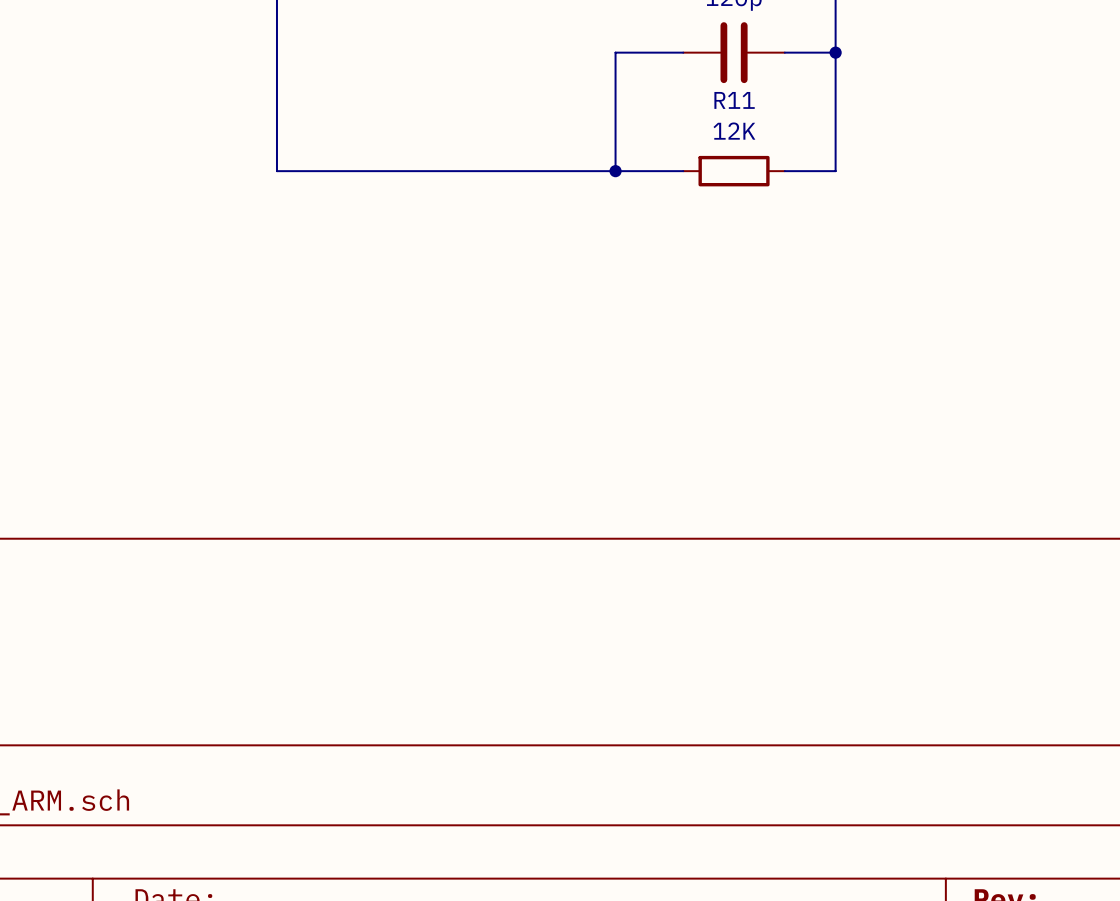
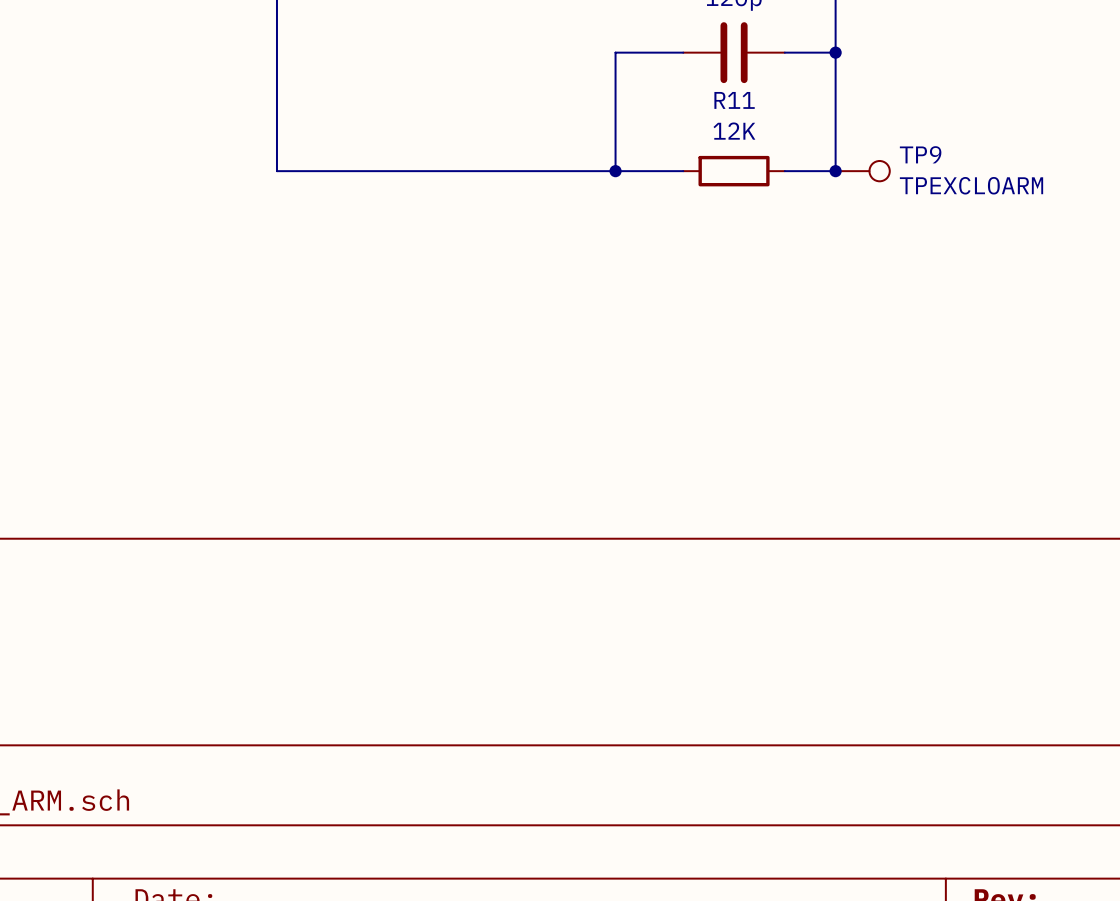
junction: none -> (835, 171)
TP9: none -> TPEXCLOARM (862, 171)

